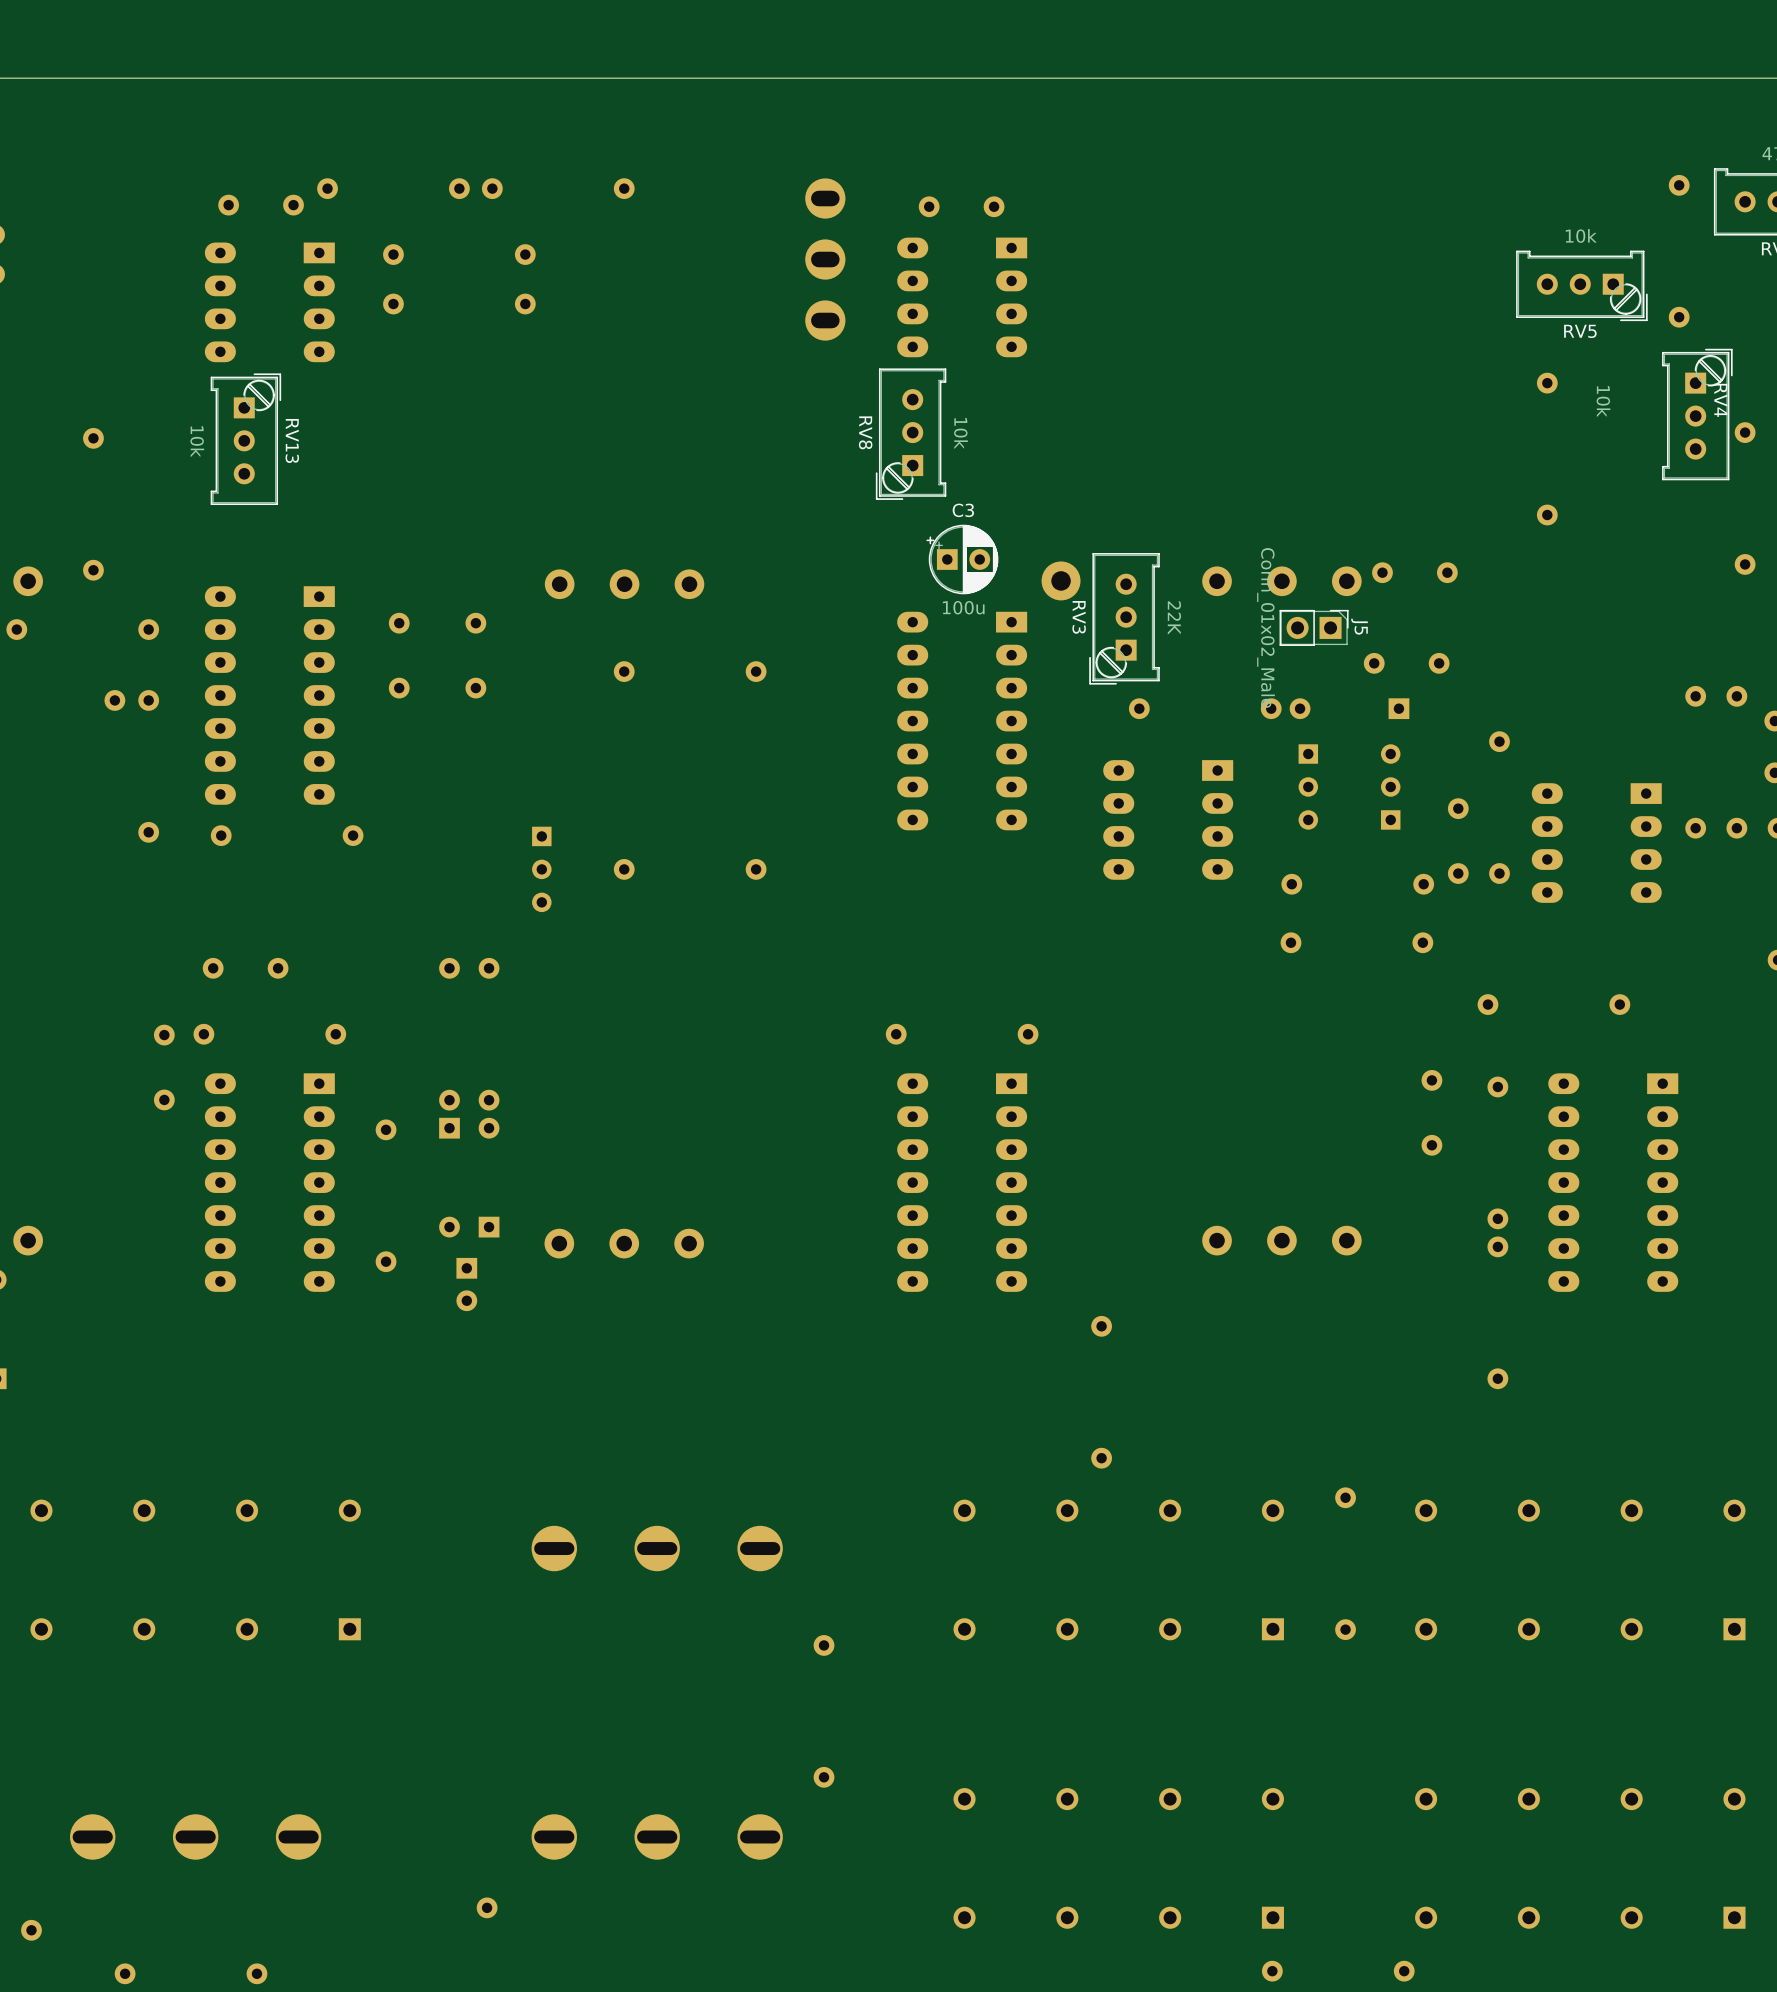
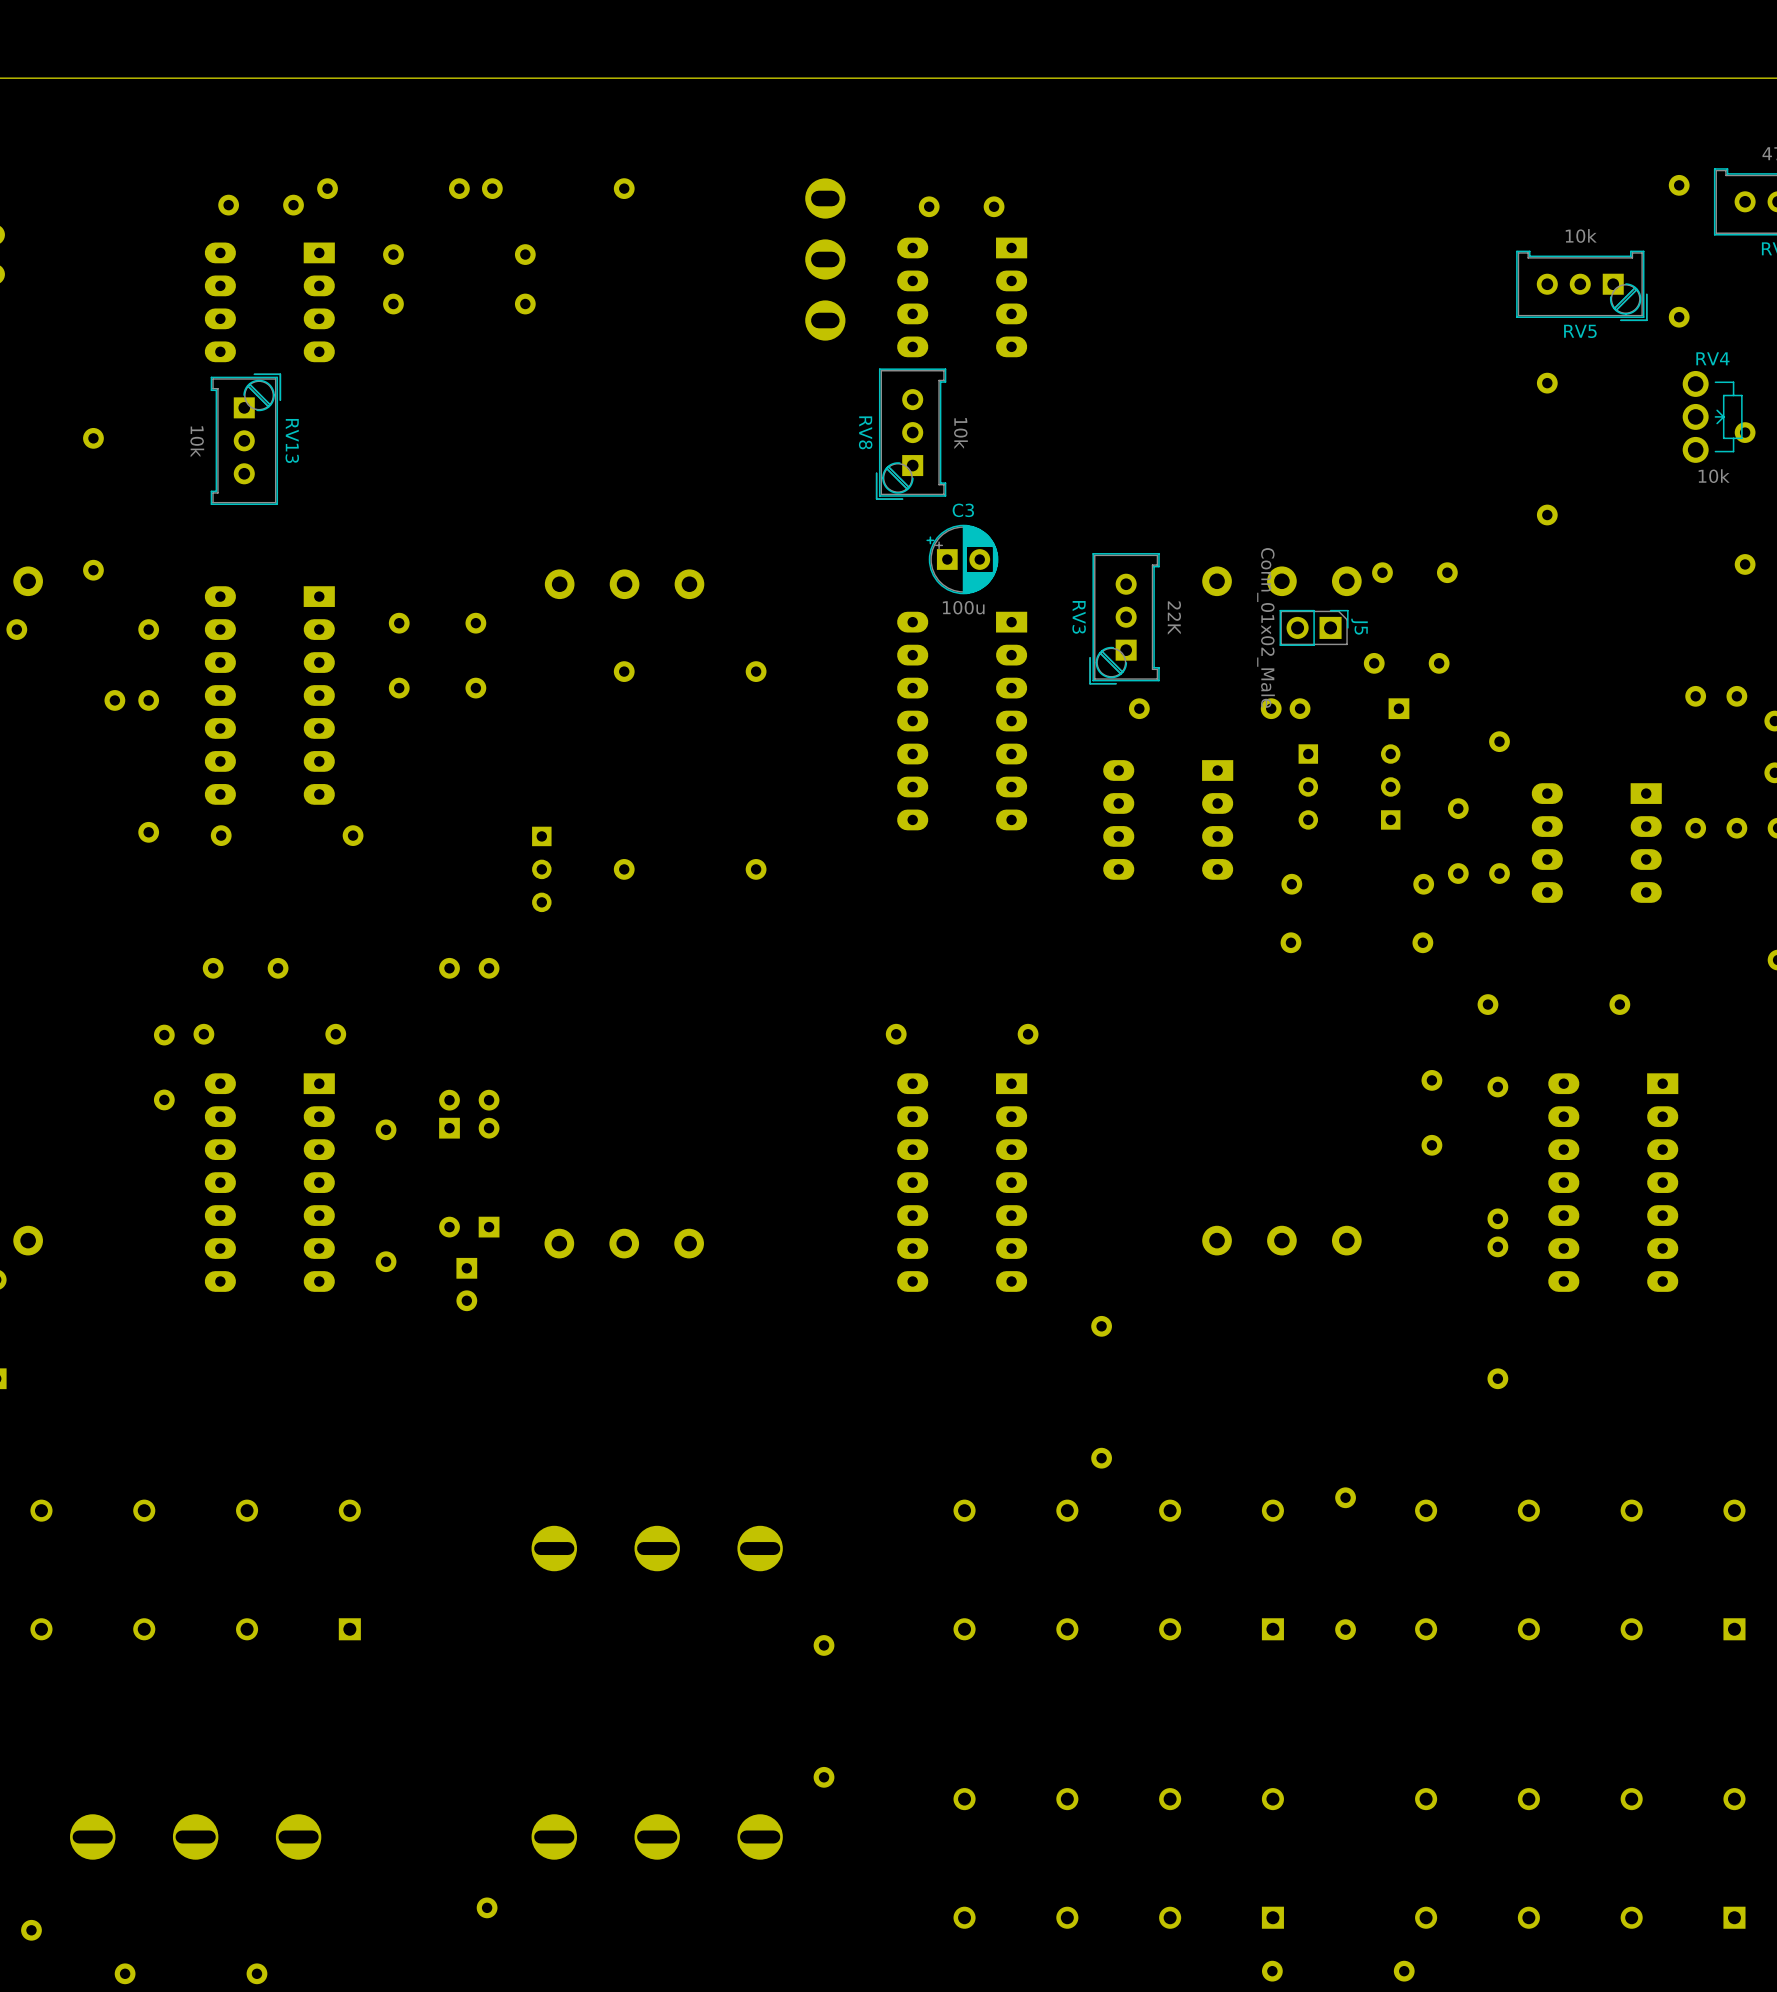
RV4 footprint: [1662, 348, 1733, 481] -> [1682, 370, 1743, 463]
RV4 name position: RV4 (1720, 400) -> RV4 (1712, 358)
RV4 value position: 10k (1603, 401) -> 10k (1714, 476)
part: (1061, 580) -> none

